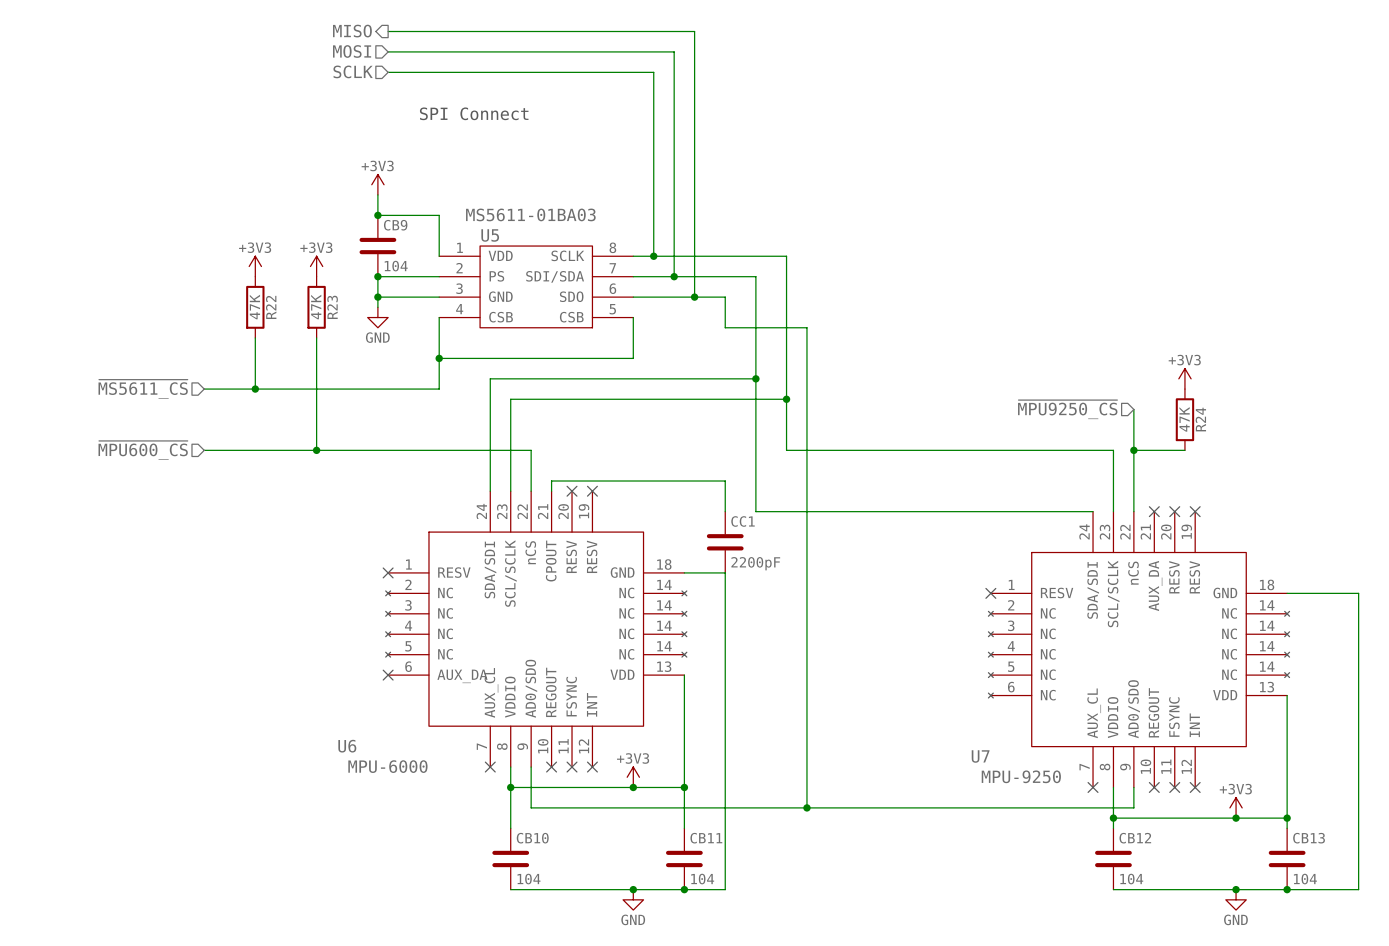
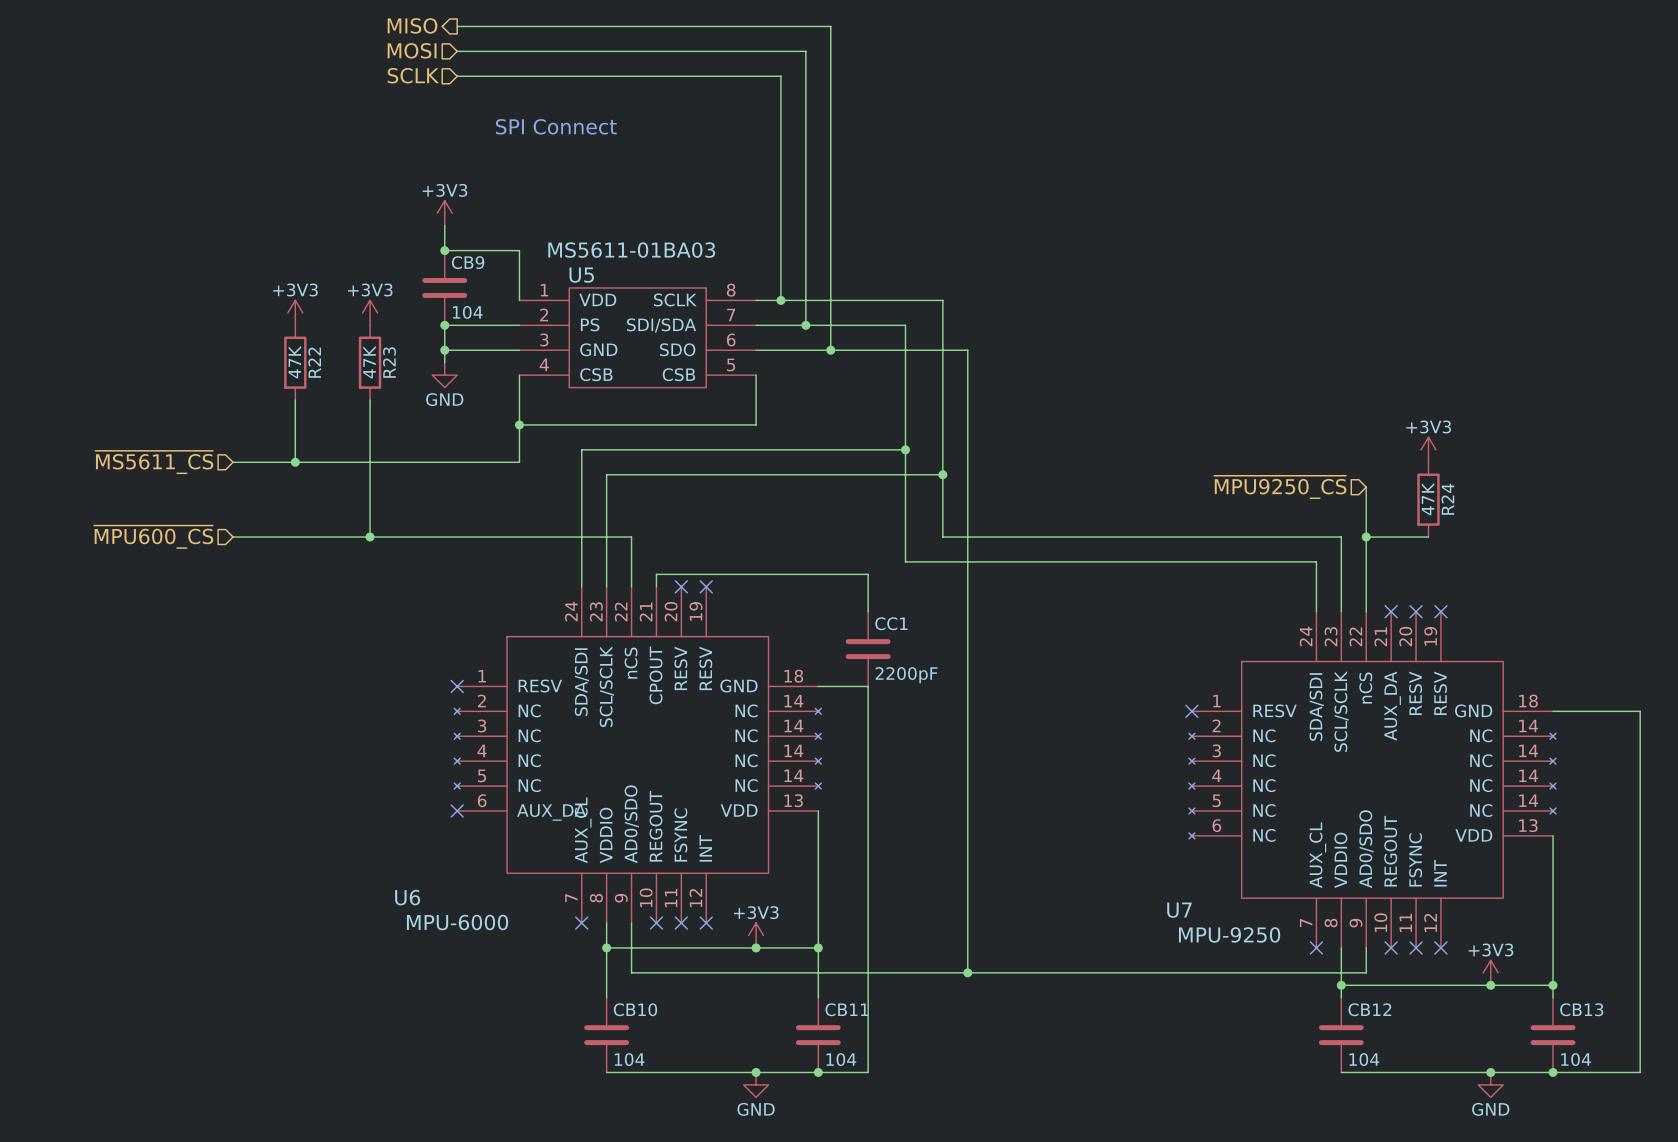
wire: (725, 297) (725, 327) (806, 327) -> (868, 350) (967, 350) (967, 387)
wire: (755, 470) (755, 511) (1093, 511) -> (905, 561) (1316, 561) (1316, 611)

